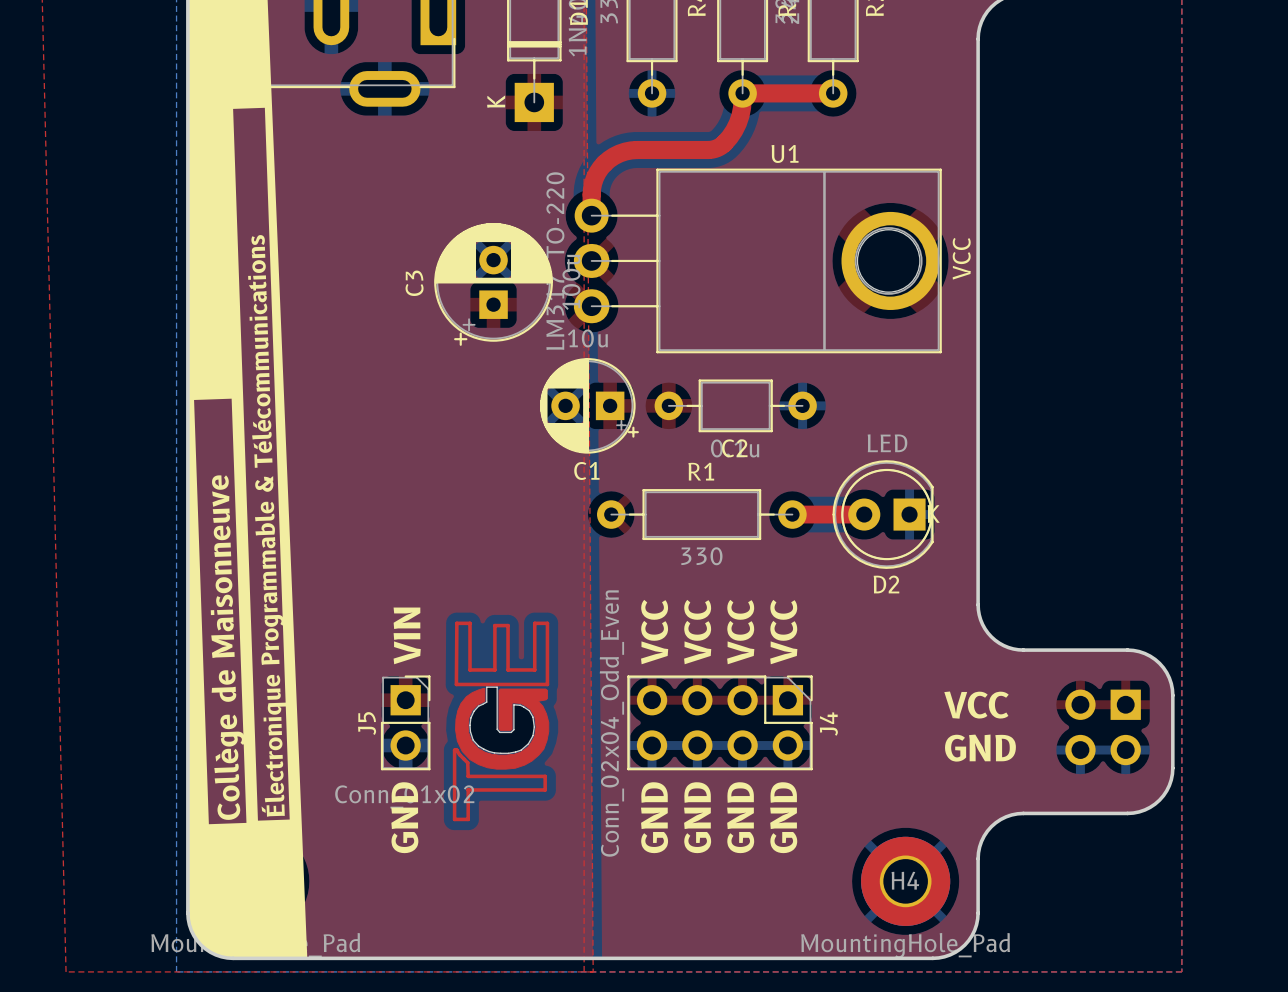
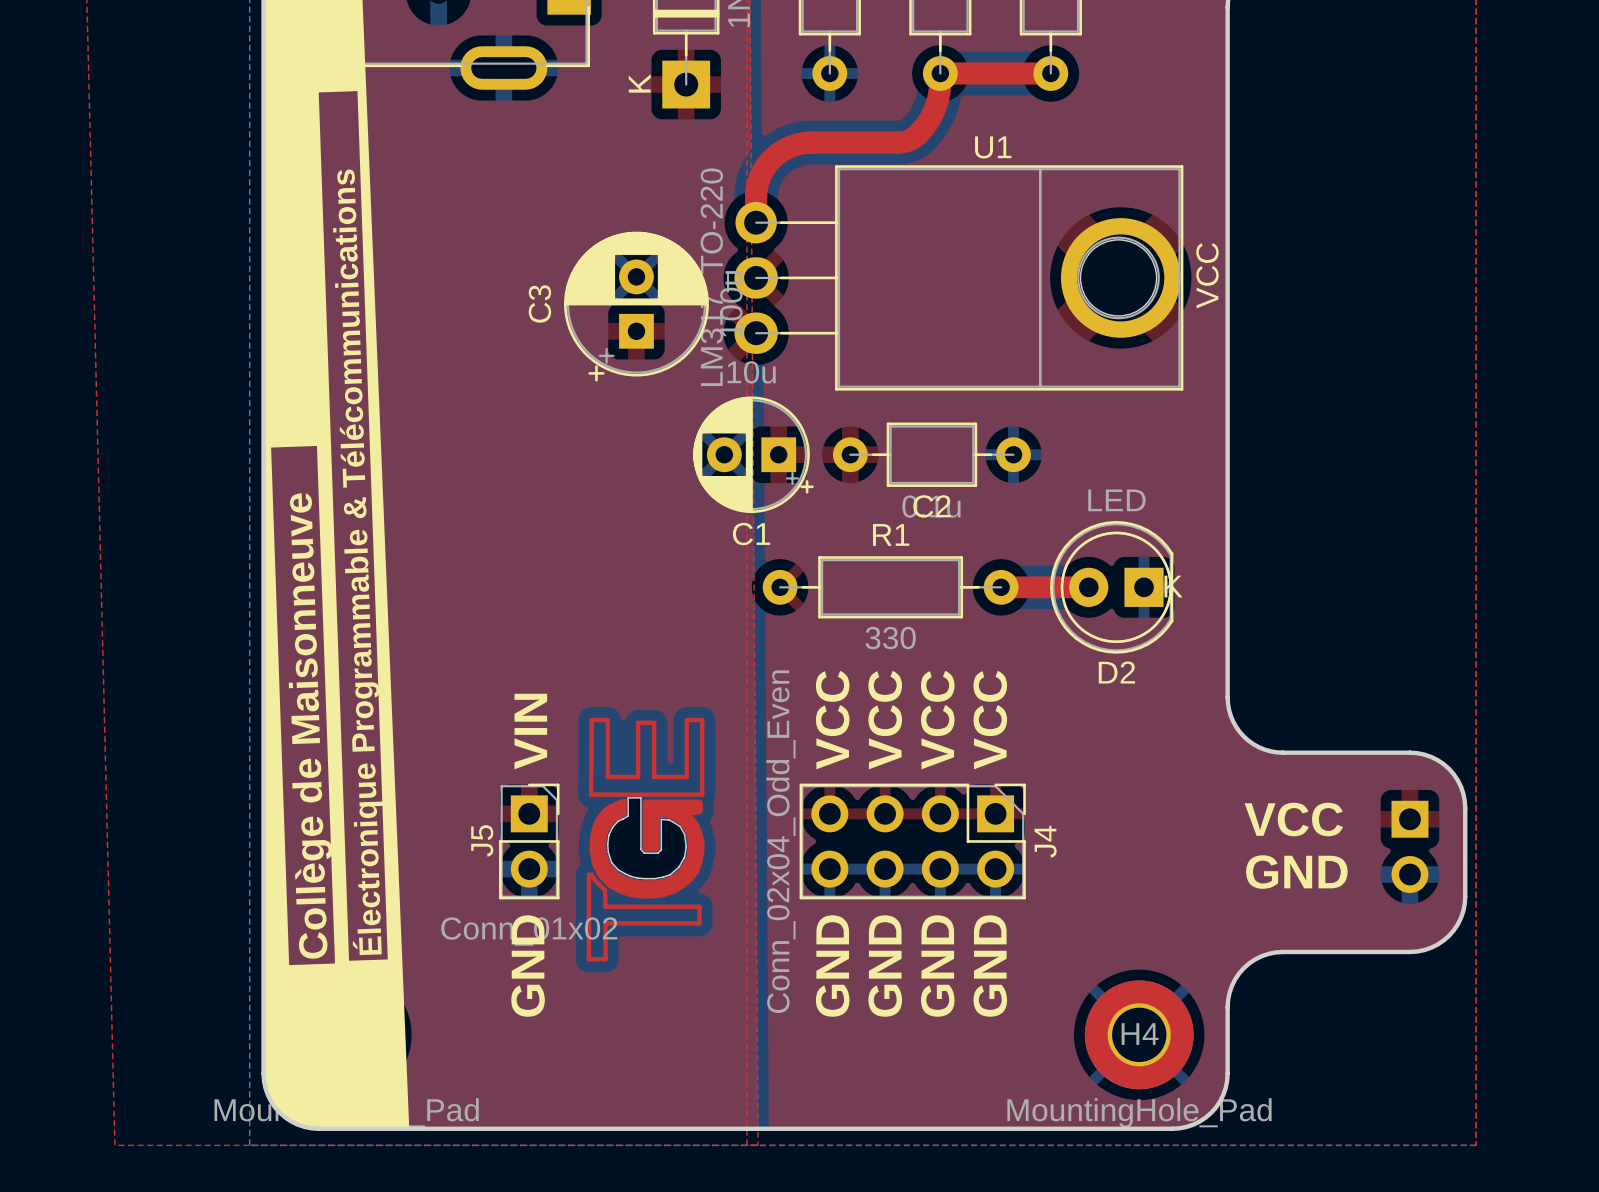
text position: VCC (976, 705) -> VCC (1293, 819)
part: (1103, 727) -> none
part: none -> (1409, 846)
text position: GND (980, 748) -> GND (1296, 872)

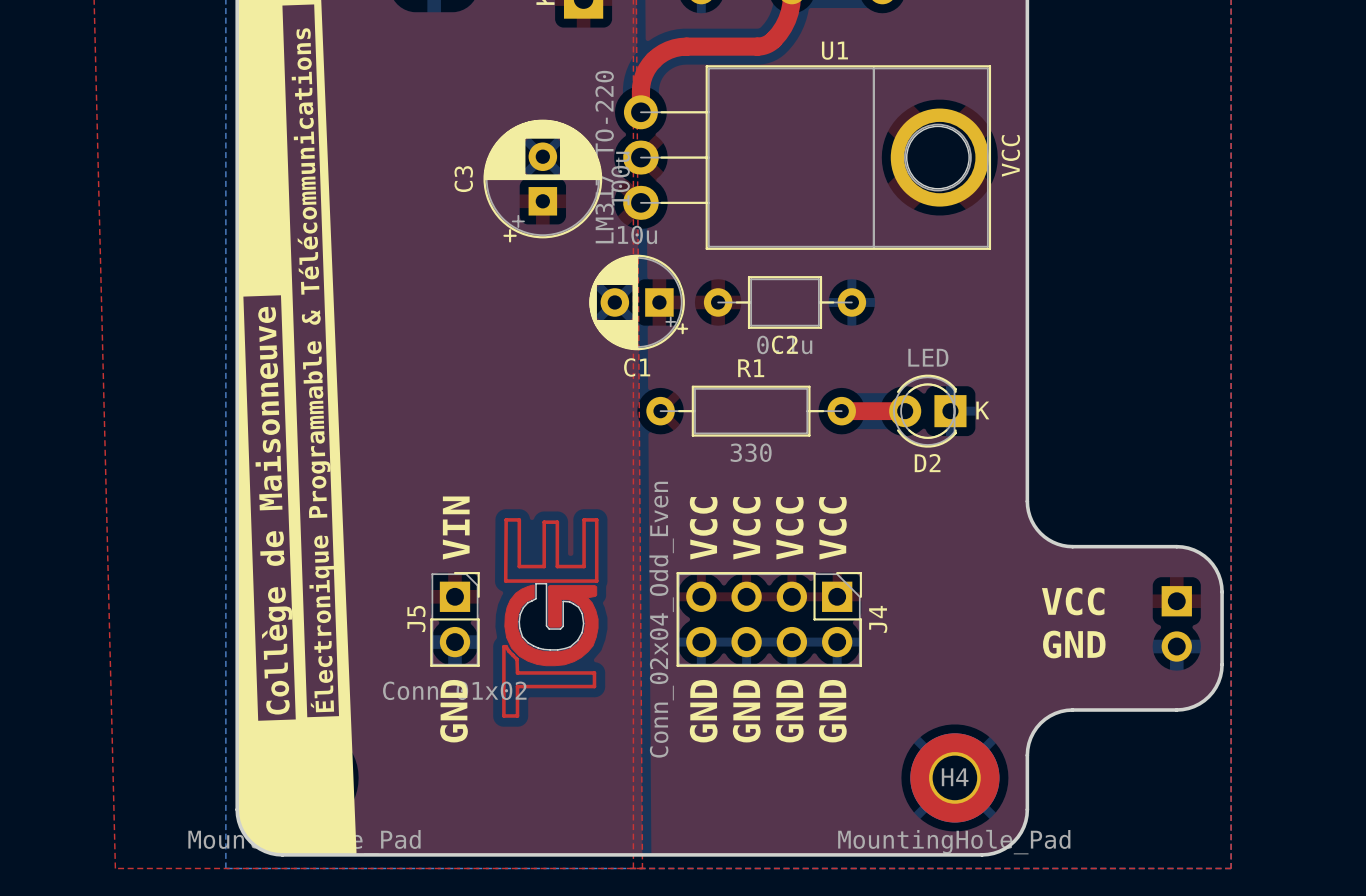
D2 footprint: [1050, 520, 1174, 654] -> [889, 374, 967, 448]

